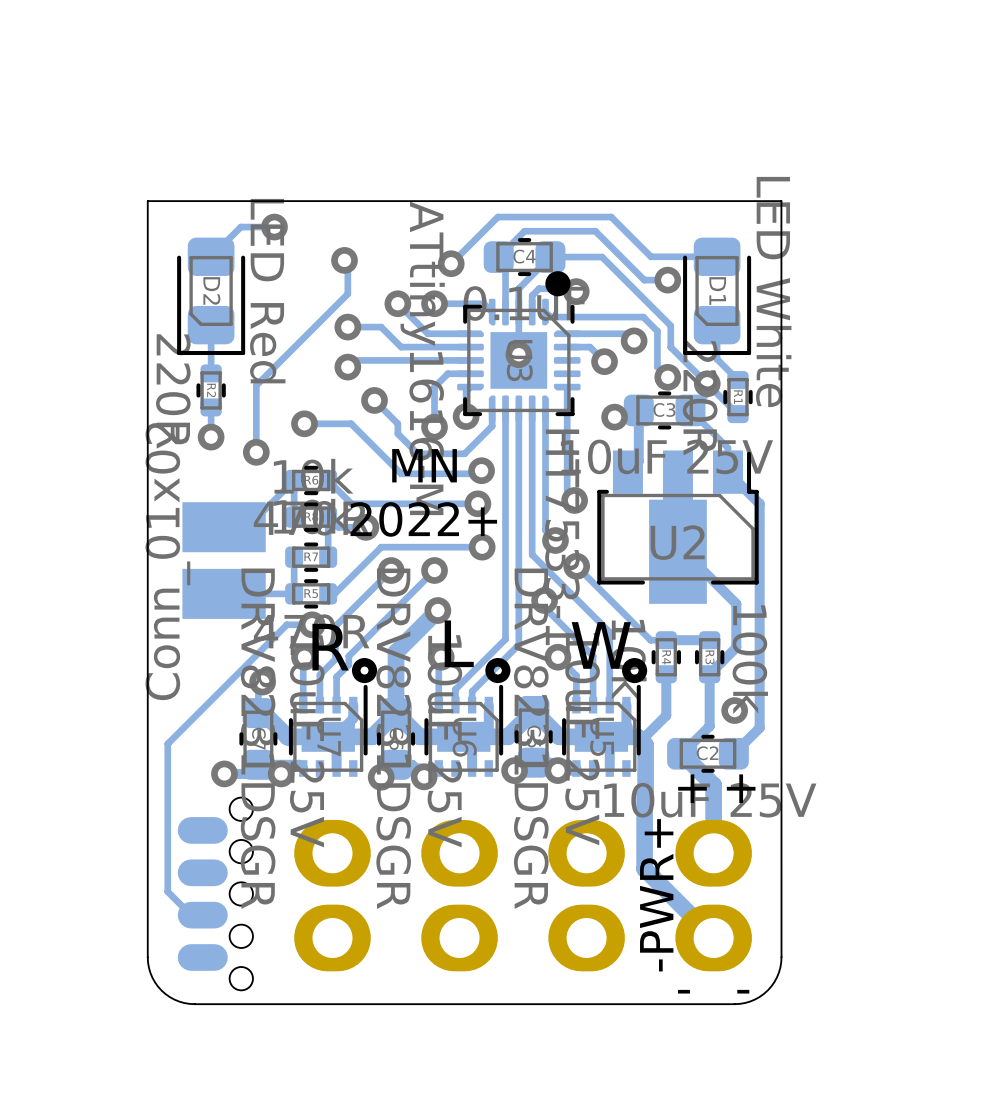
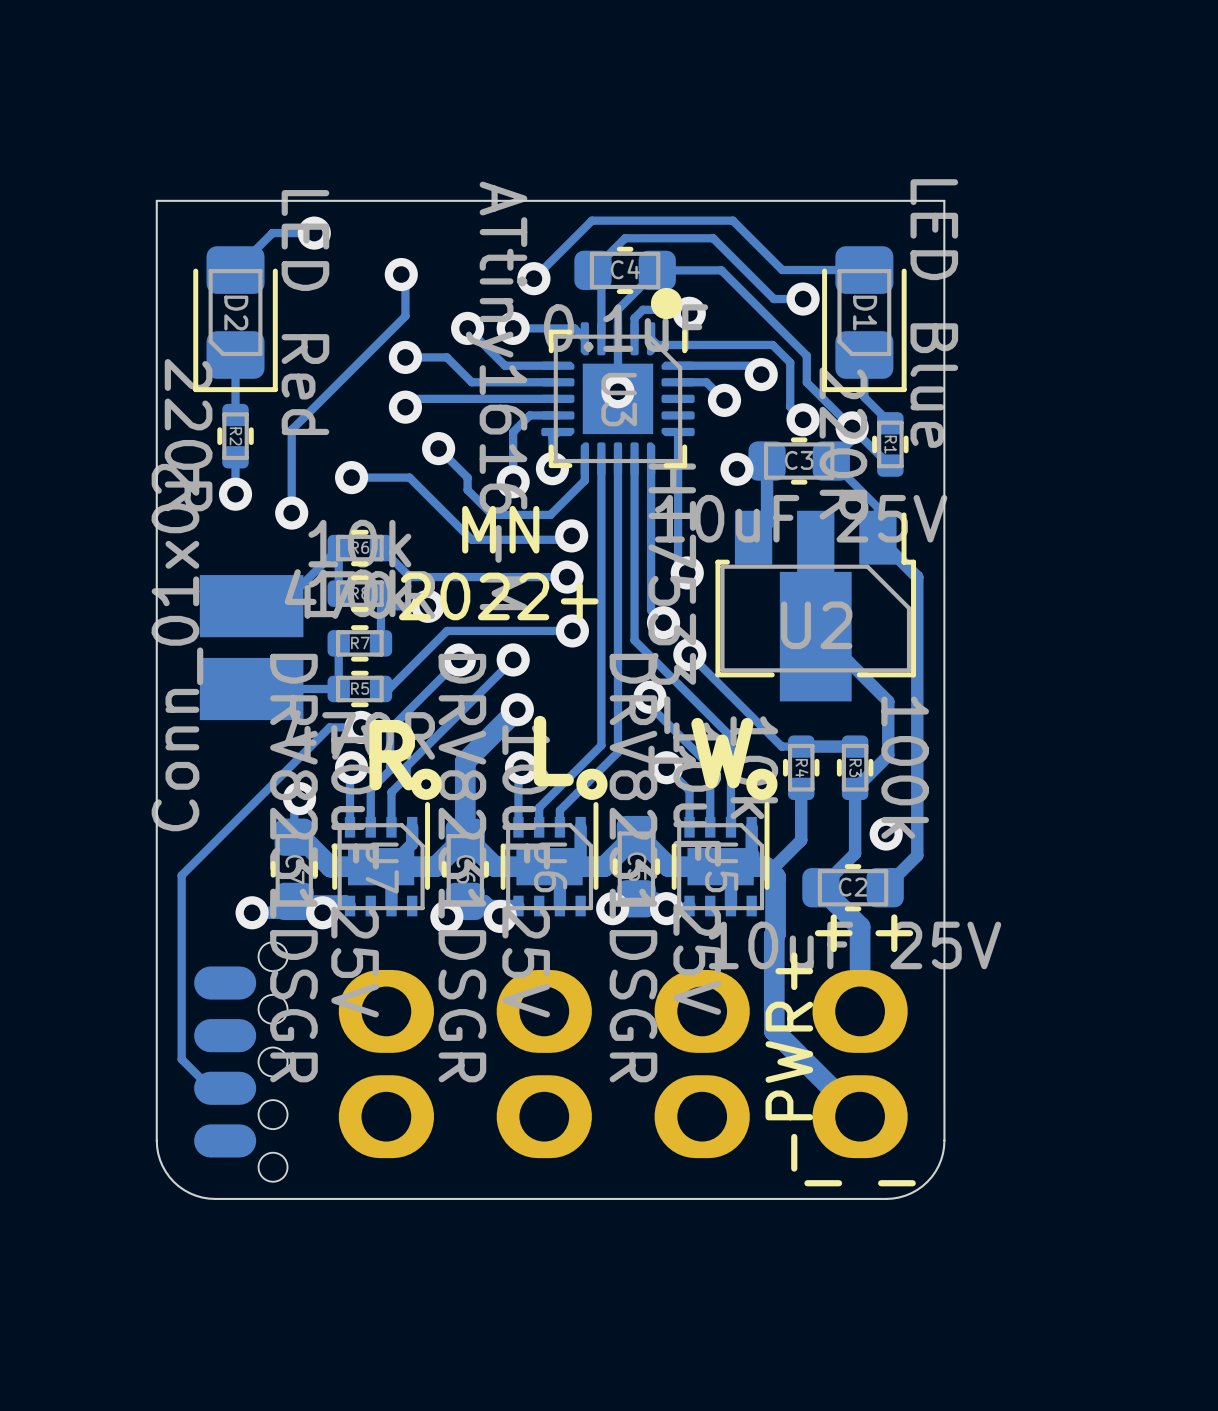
D1 value: LED White (773, 292) -> LED Blue (934, 313)

